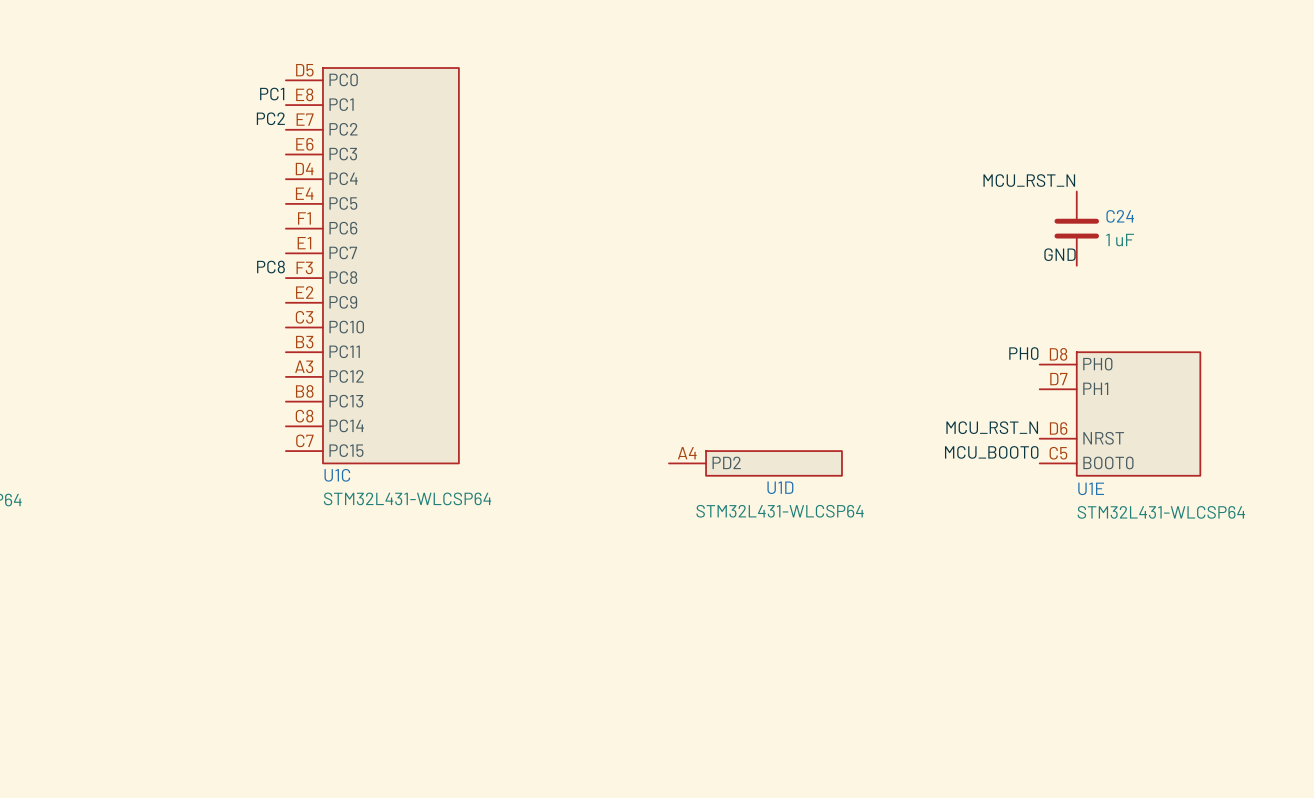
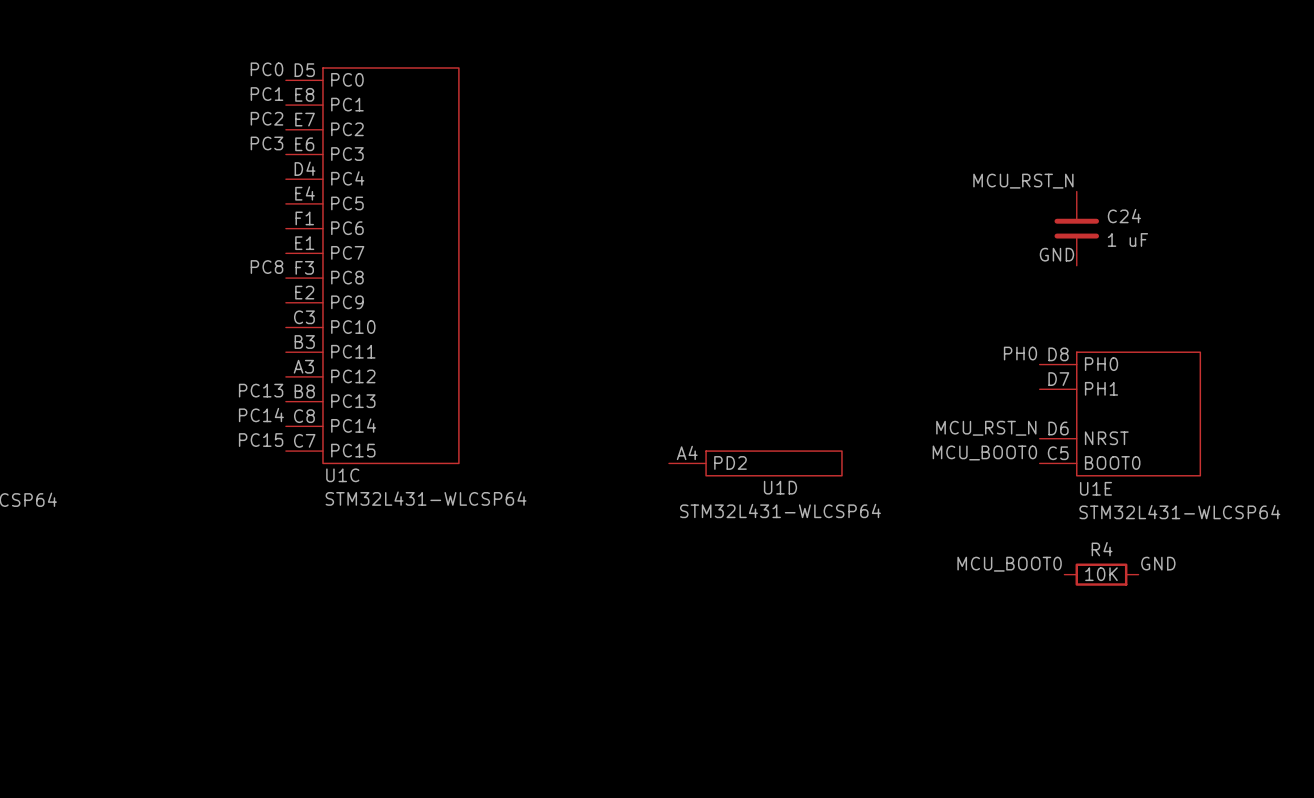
label: none -> PC0 (266, 69)
label: none -> PC3 (266, 143)
label: none -> PC13 (261, 390)
label: none -> PC14 (261, 415)
label: none -> PC15 (261, 440)
label: none -> MCU_BOOT0 (1009, 564)
label: none -> GND (1158, 563)
R4: none -> 10K (1101, 574)

